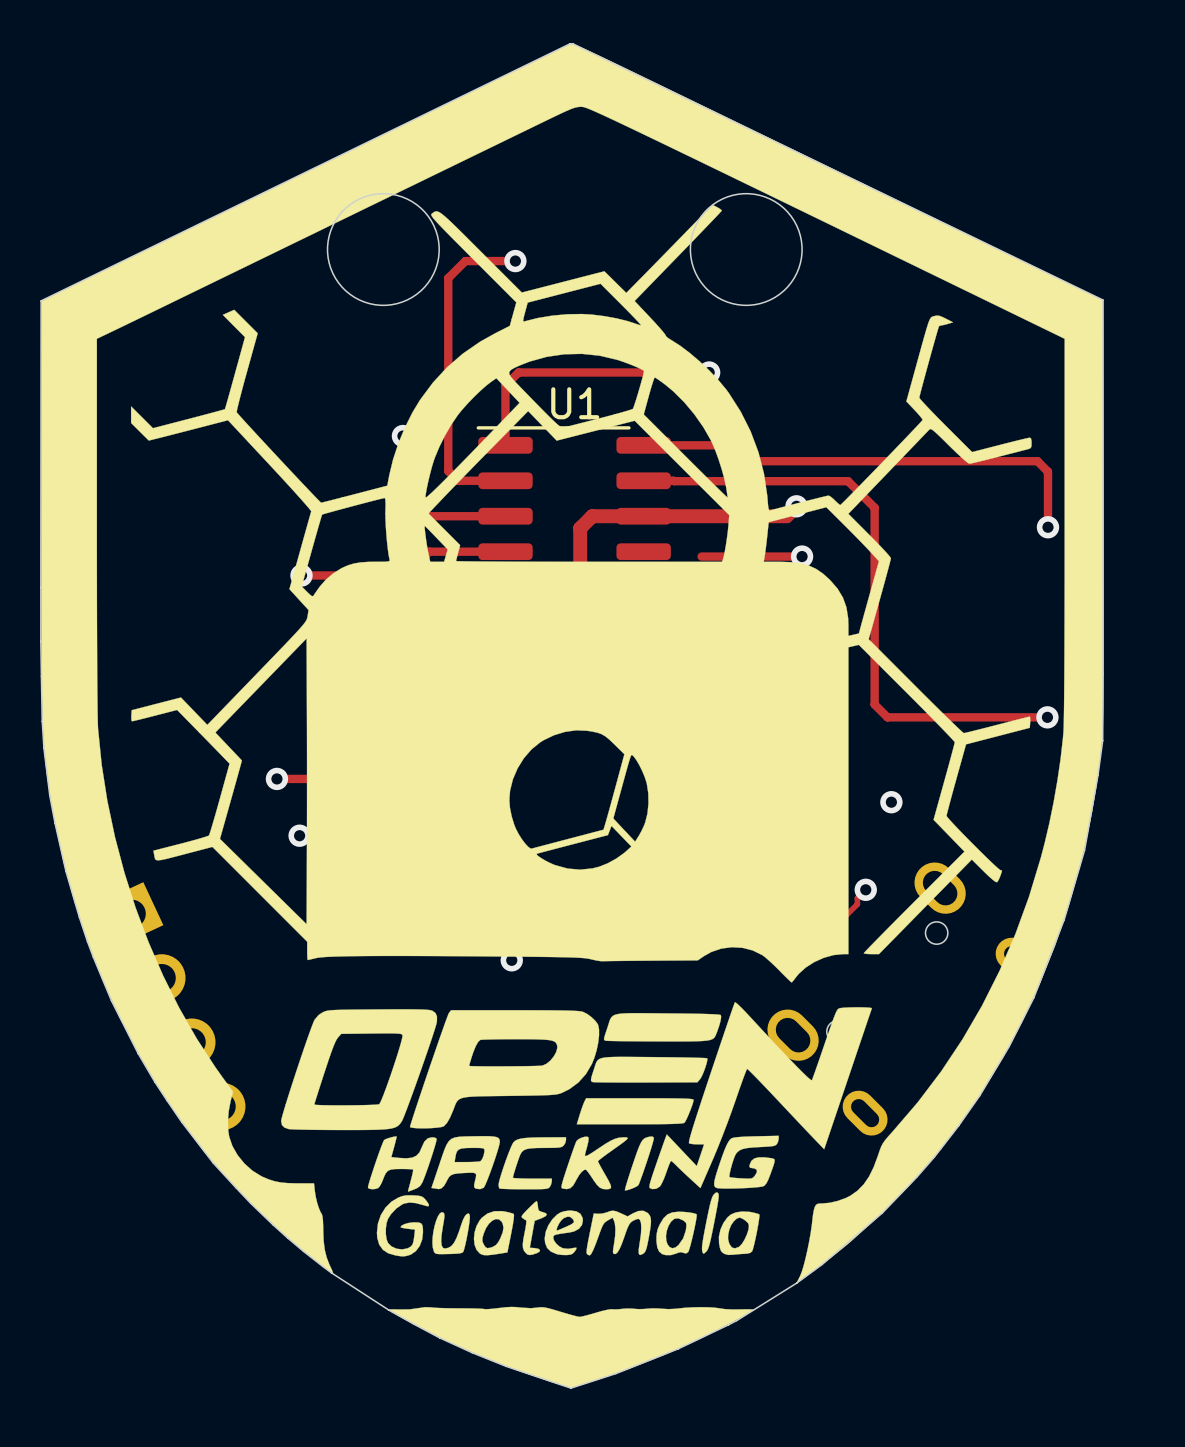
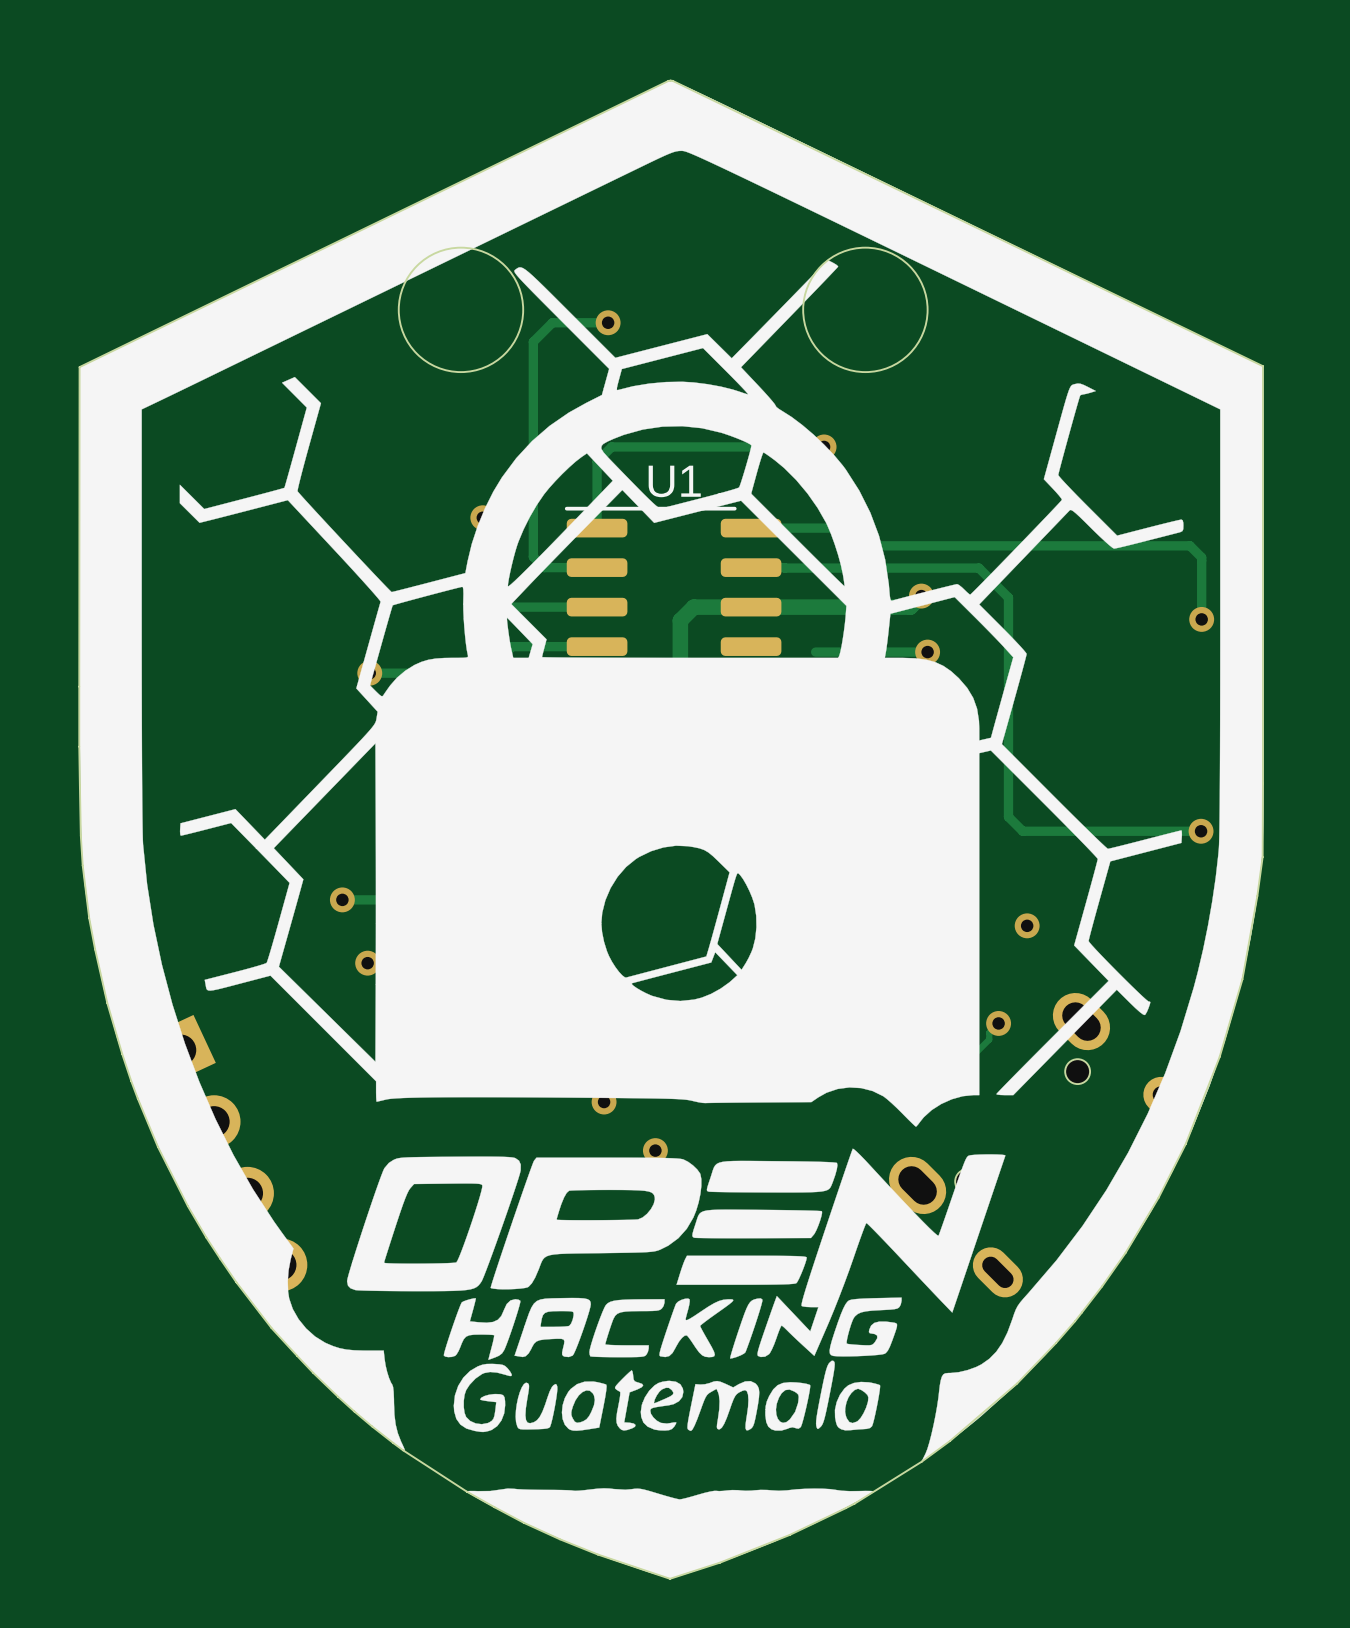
via: none -> (655, 1150)

